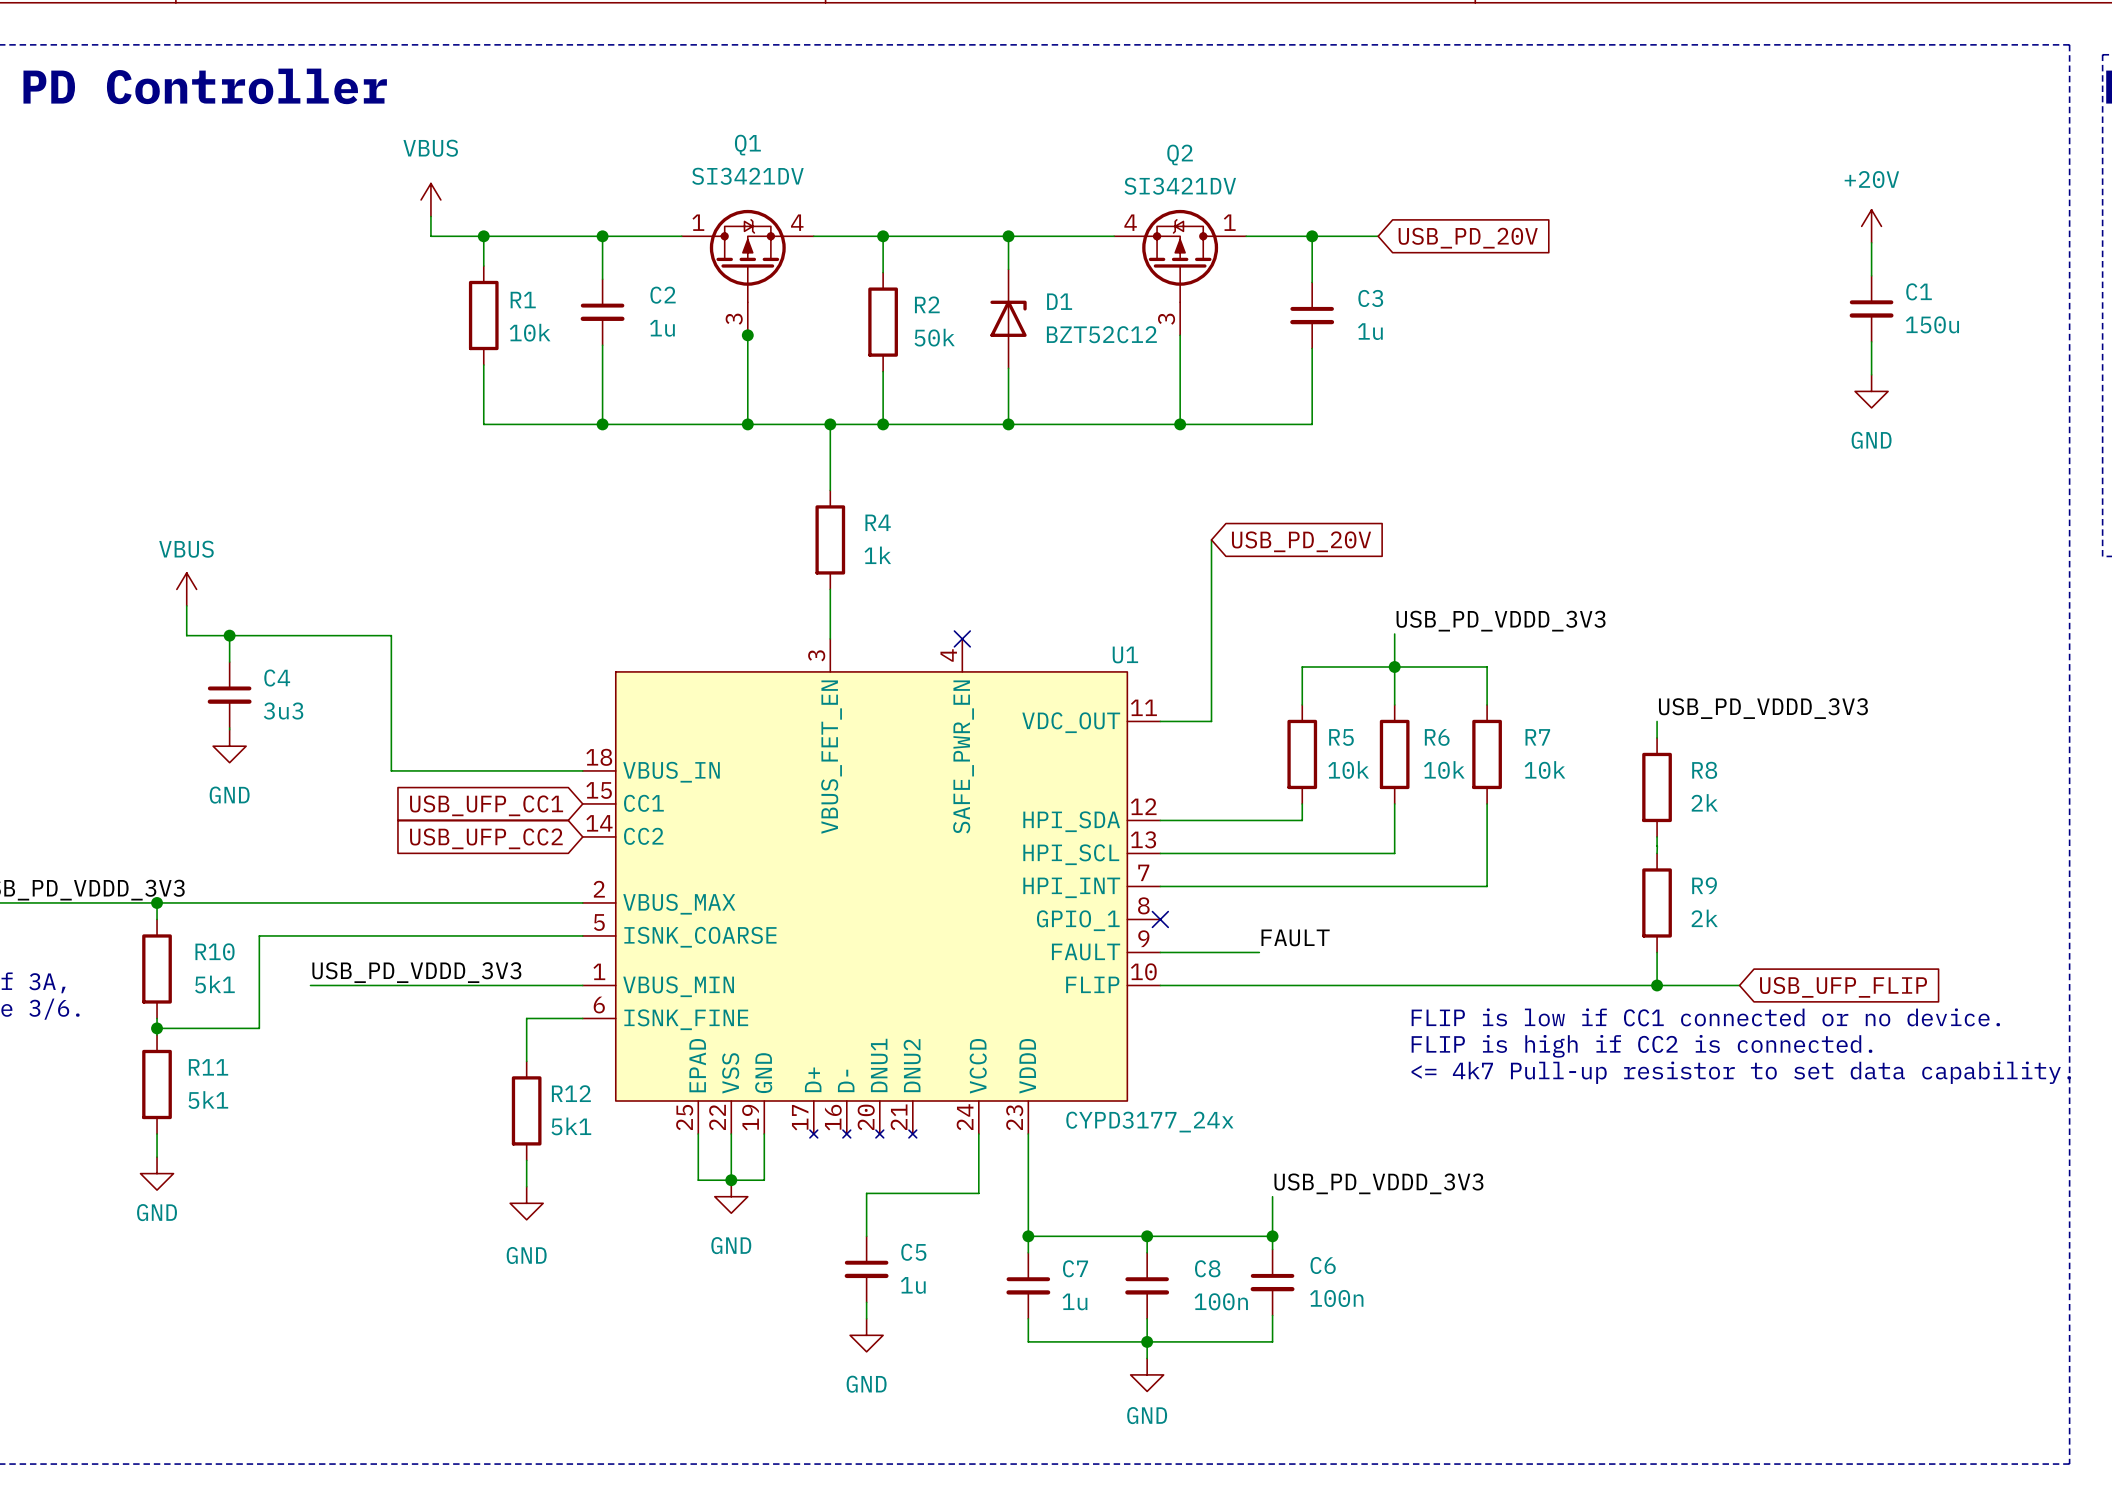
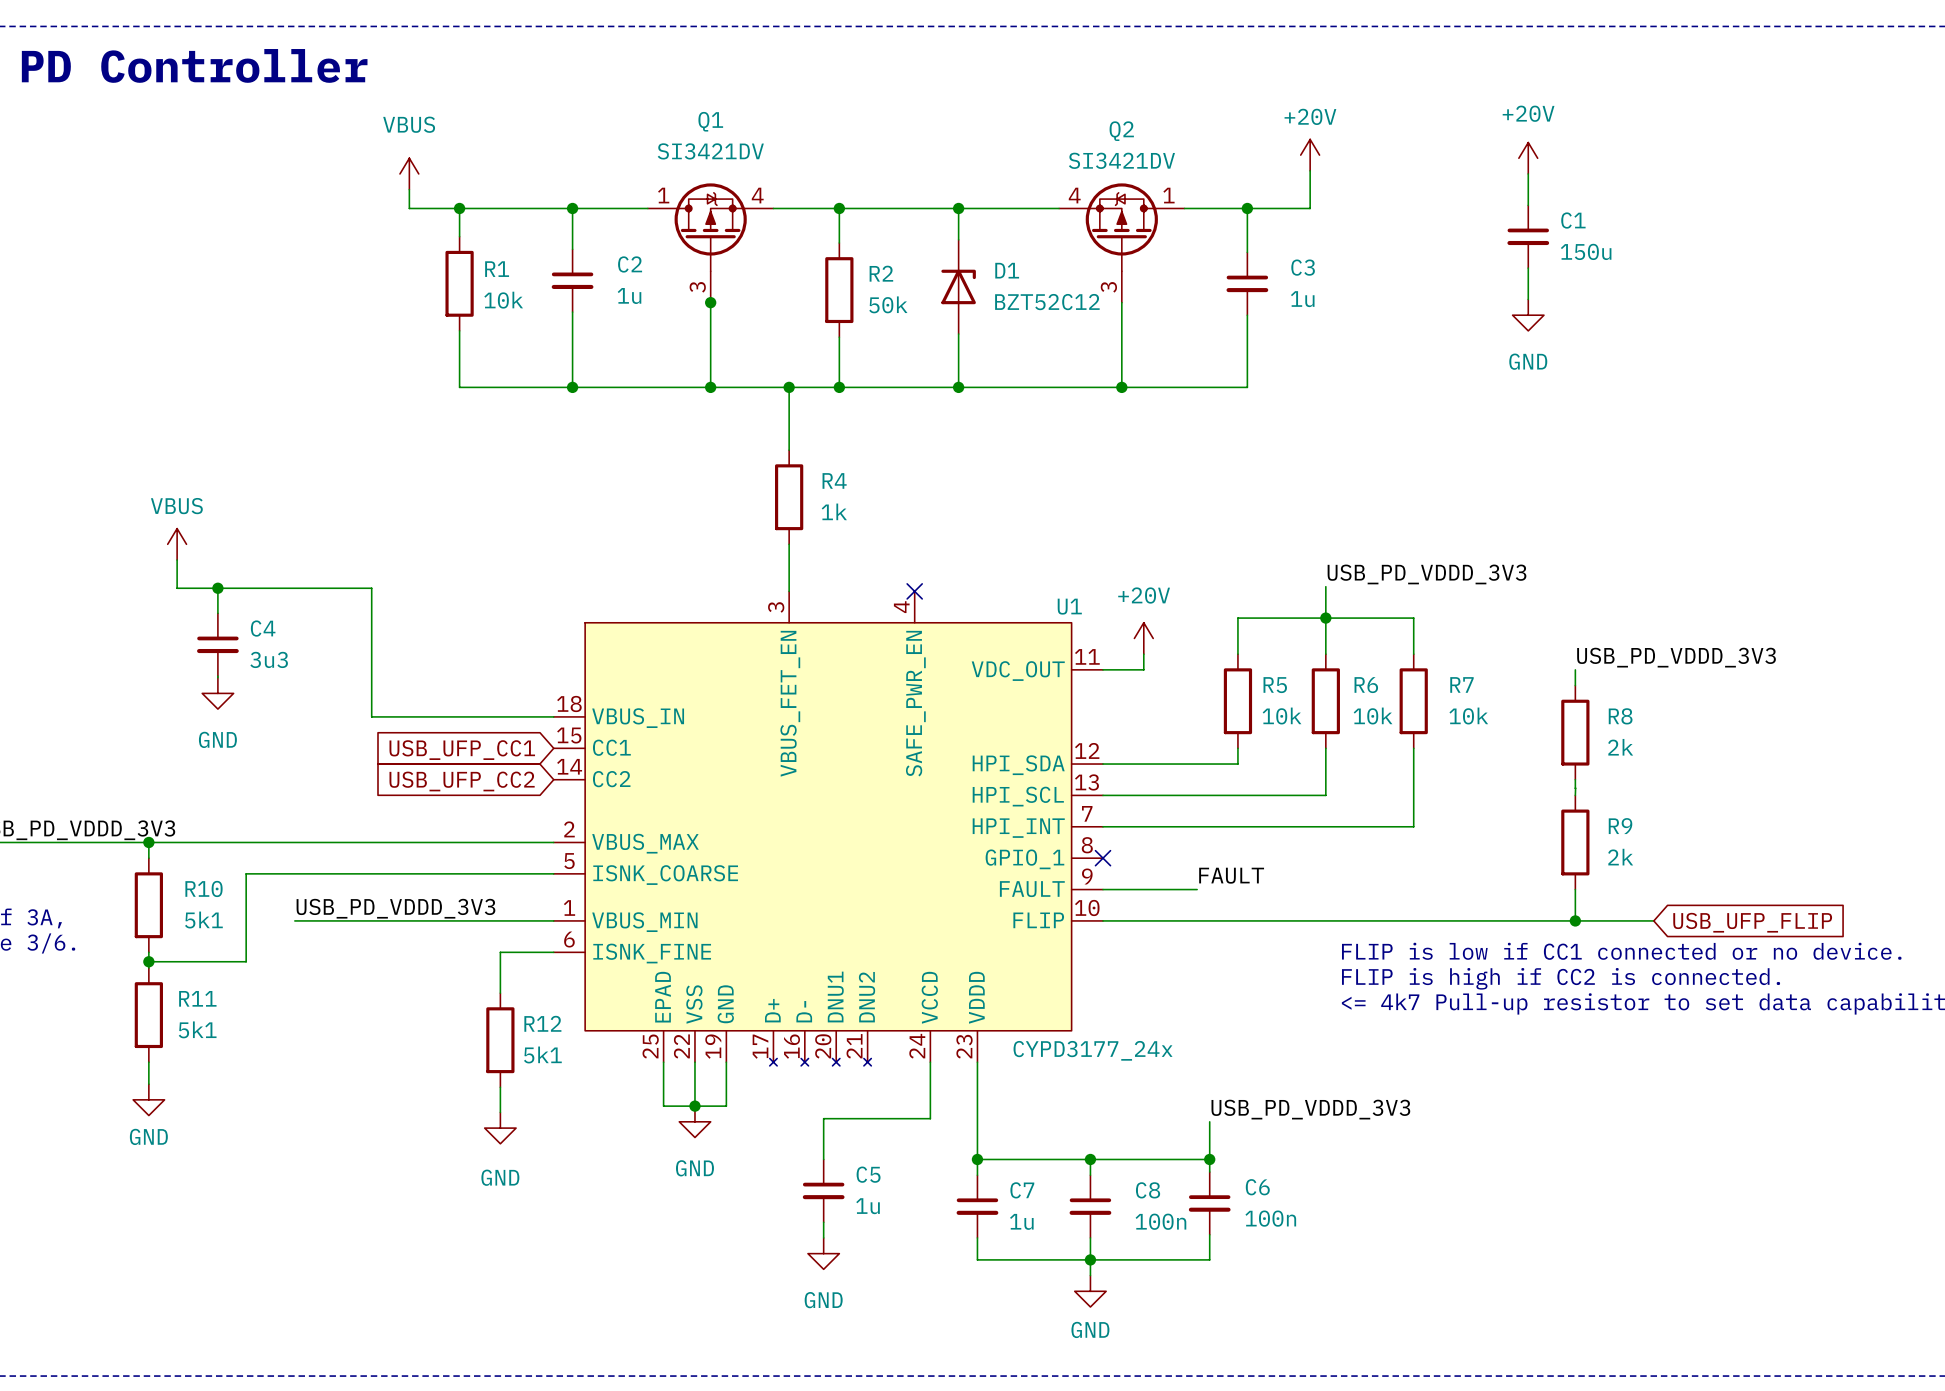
power symbol: none -> +20V (1310, 155)
power symbol: none -> +20V (1528, 158)
wire: none -> (1310, 170) (1310, 208)
power symbol: +20V (1871, 226) -> none
global label: USB_PD_20V (1468, 238) -> none
wire: (1871, 242) (1871, 275) -> (1528, 173) (1528, 205)
C1 position: (1871, 308) -> (1528, 236)
wire: (1871, 341) (1871, 374) -> (1528, 268) (1528, 299)
power symbol position: GND (1871, 391) -> GND (1528, 315)
wire: (1211, 539) (1211, 721) (1203, 721) -> (1143, 654) (1143, 669)
global label: USB_PD_20V (1301, 541) -> none
power symbol: none -> +20V (1143, 638)

